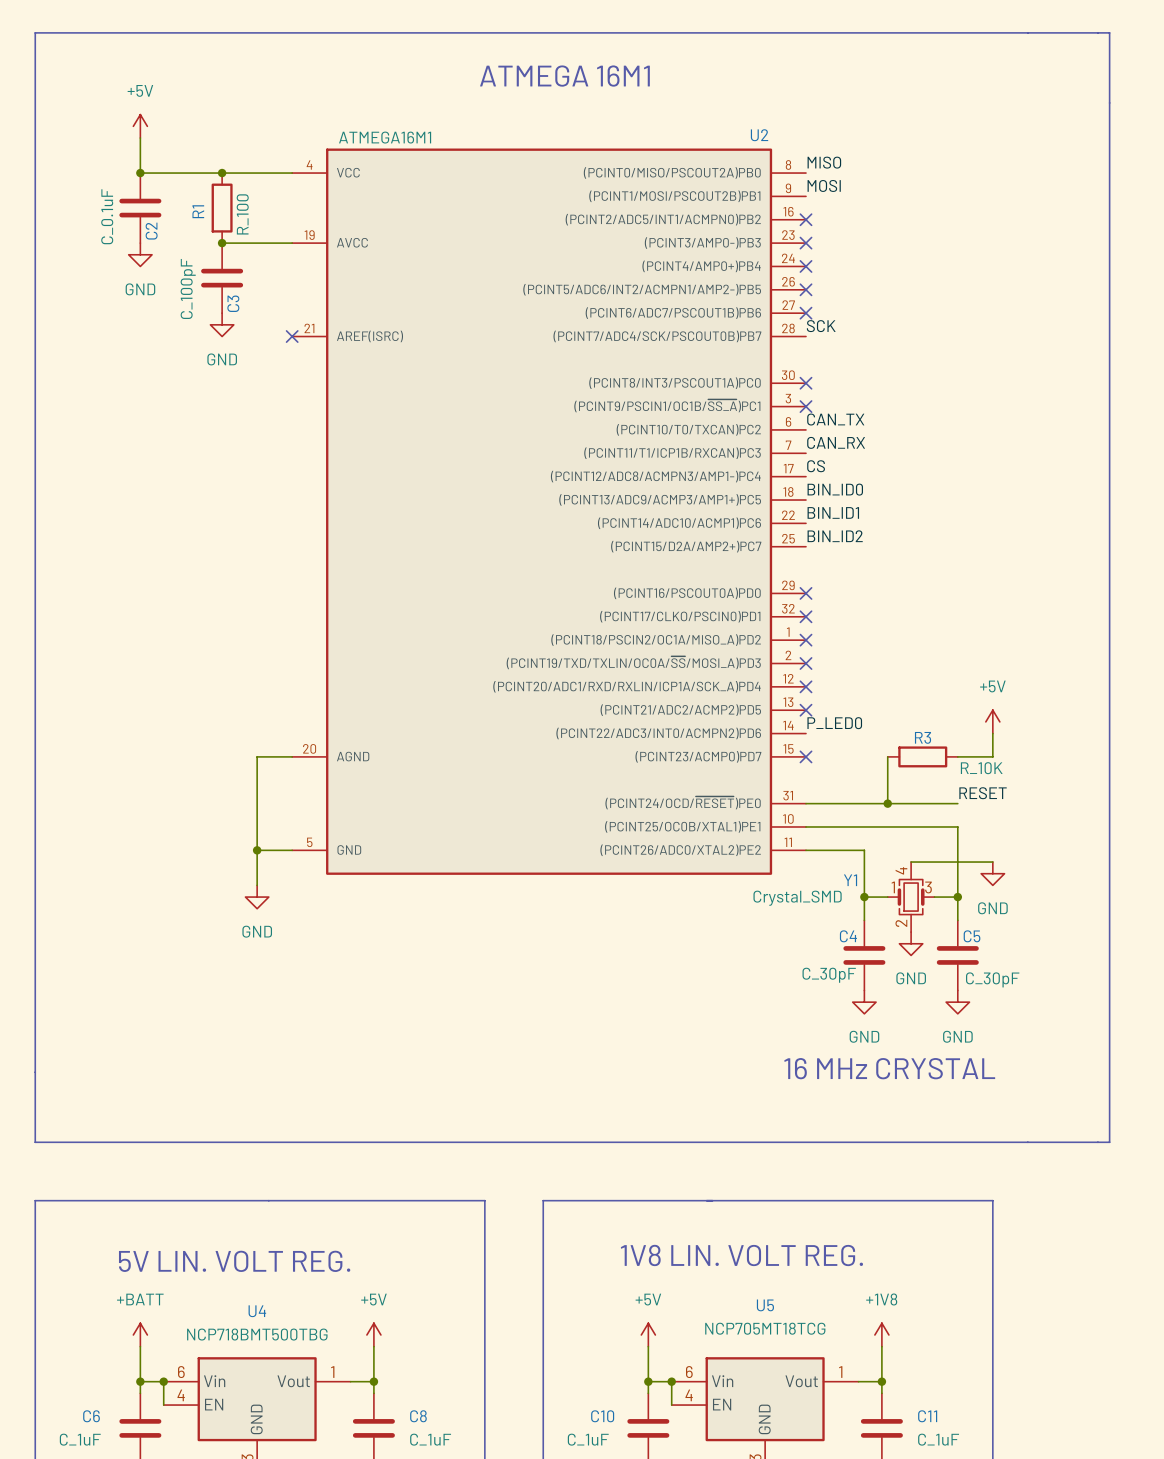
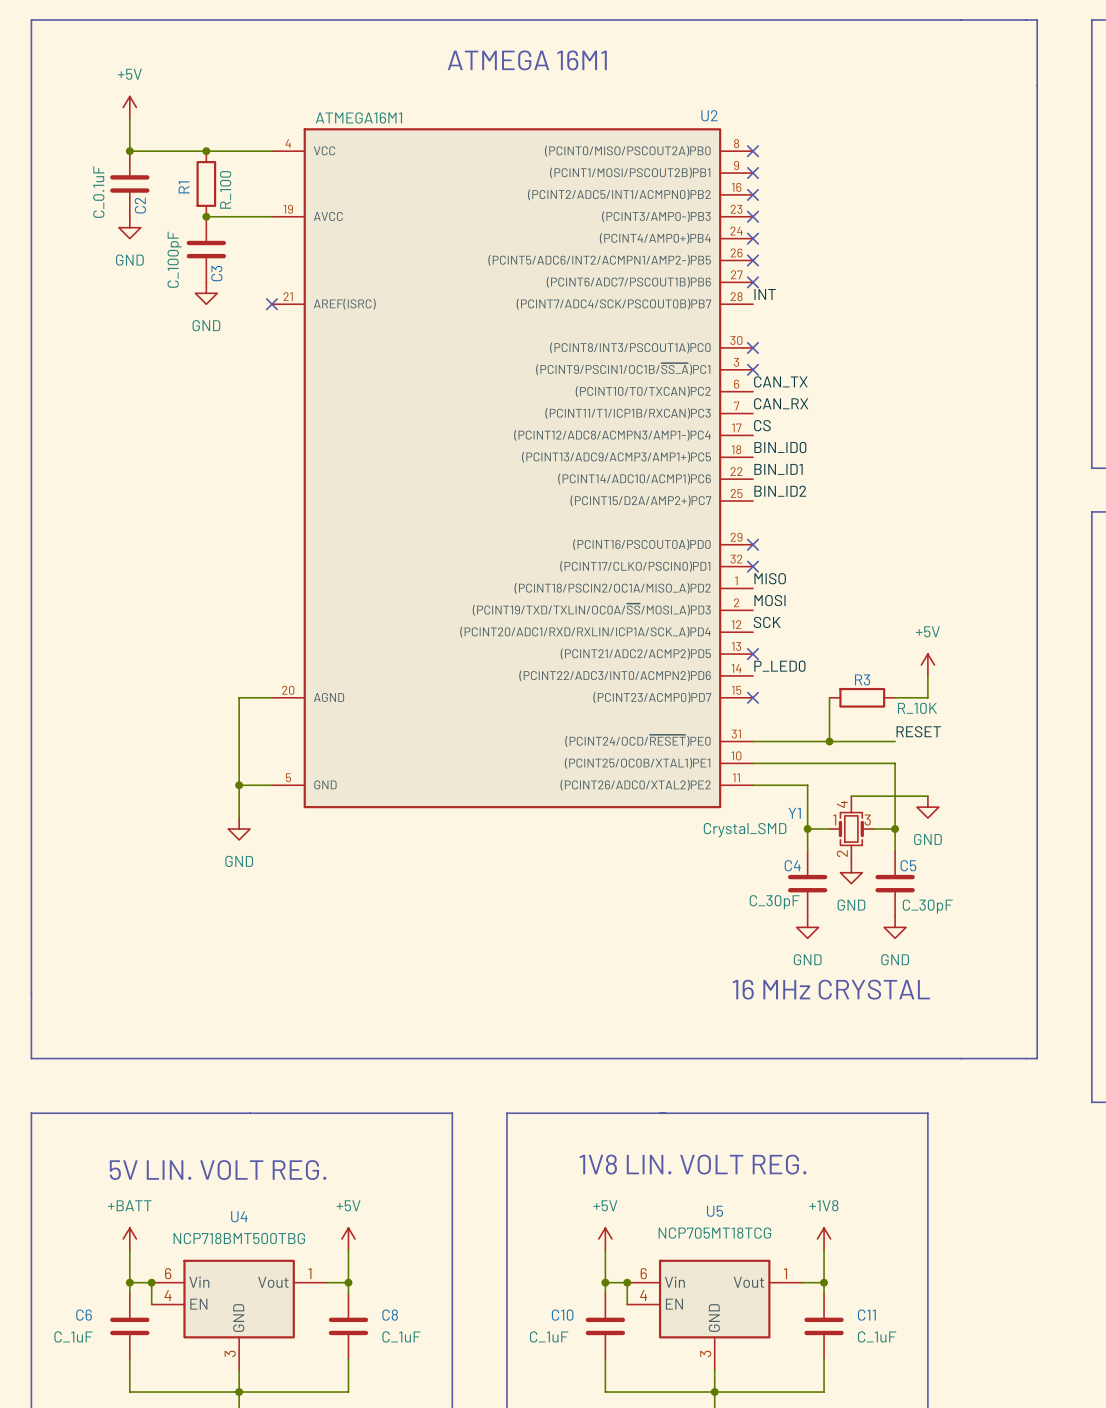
label: MISO (824, 162) -> none
no-connect mark: none -> (752, 151)
label: MOSI (824, 185) -> none
no-connect mark: none -> (752, 173)
label: SCK (821, 326) -> INT (765, 294)
label: none -> MISO (770, 578)
no-connect mark: (805, 640) -> none
label: none -> MOSI (769, 600)
no-connect mark: (805, 663) -> none
label: none -> SCK (767, 622)
no-connect mark: (805, 686) -> none

